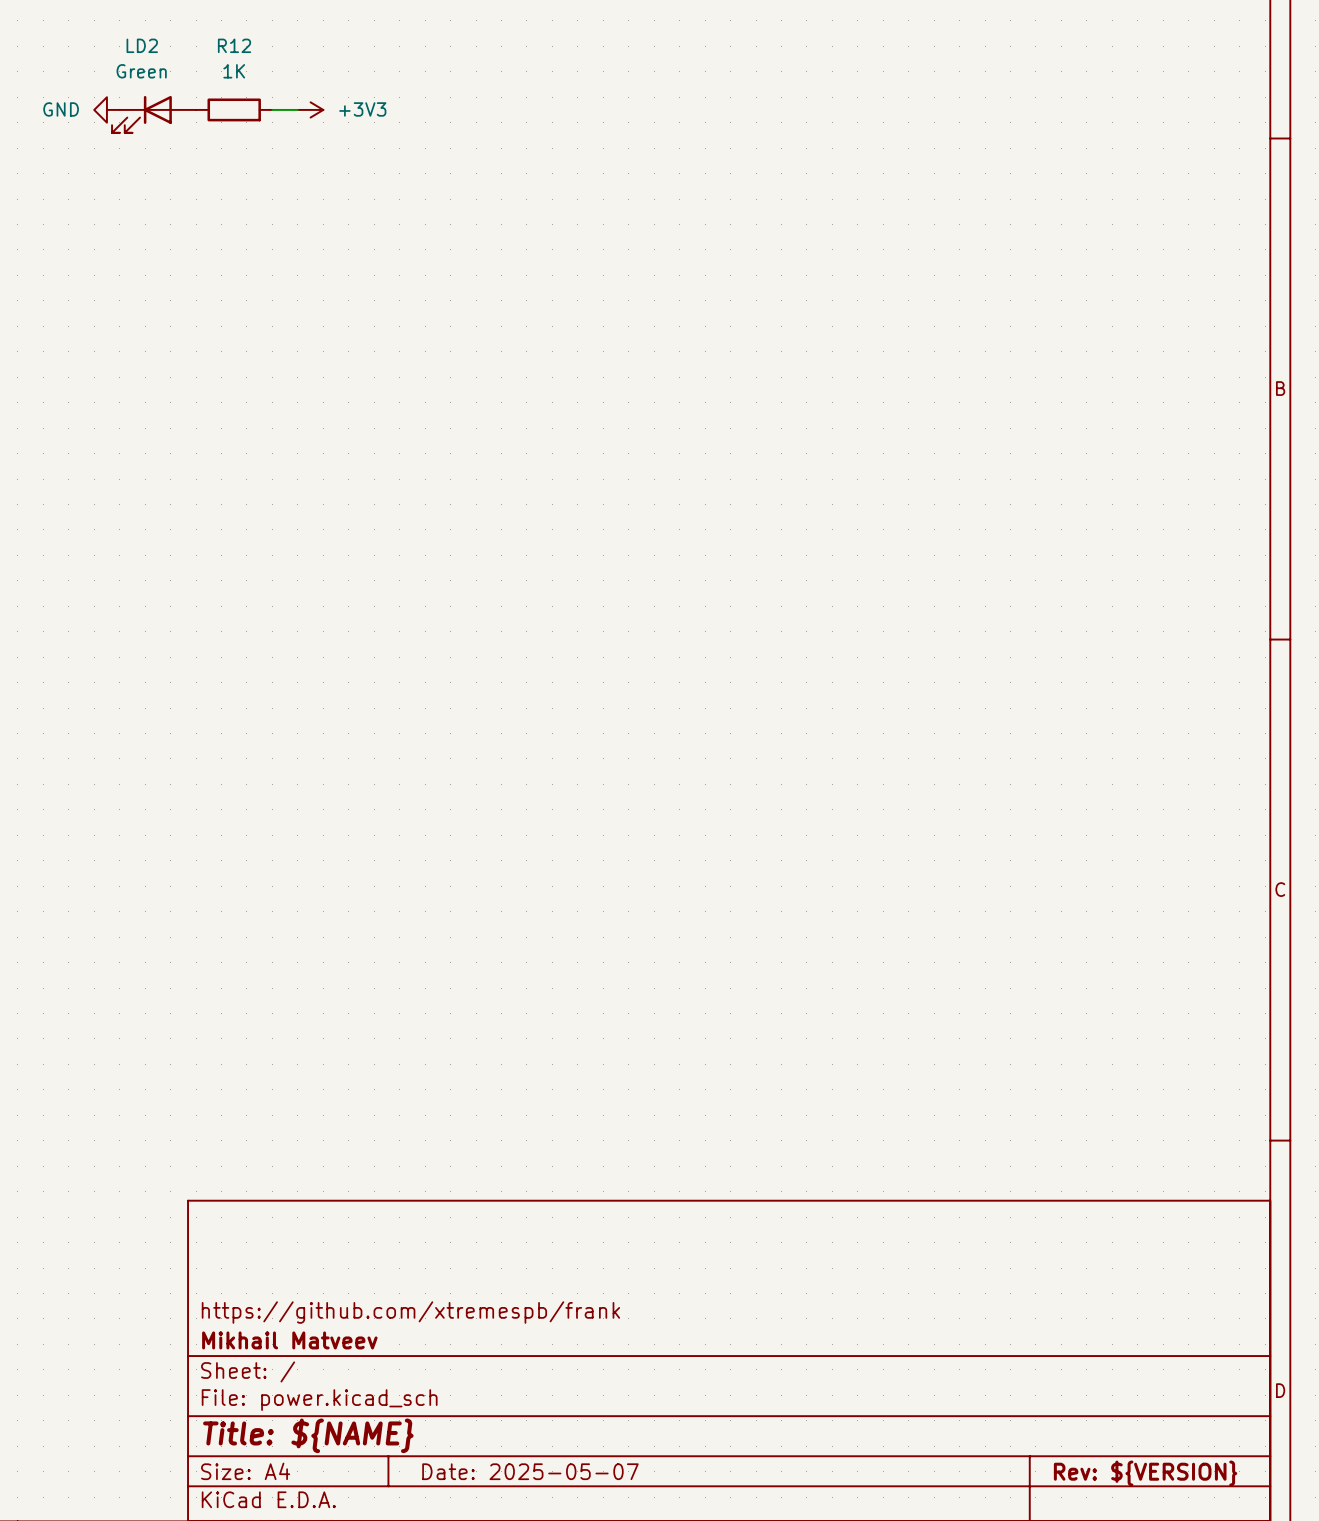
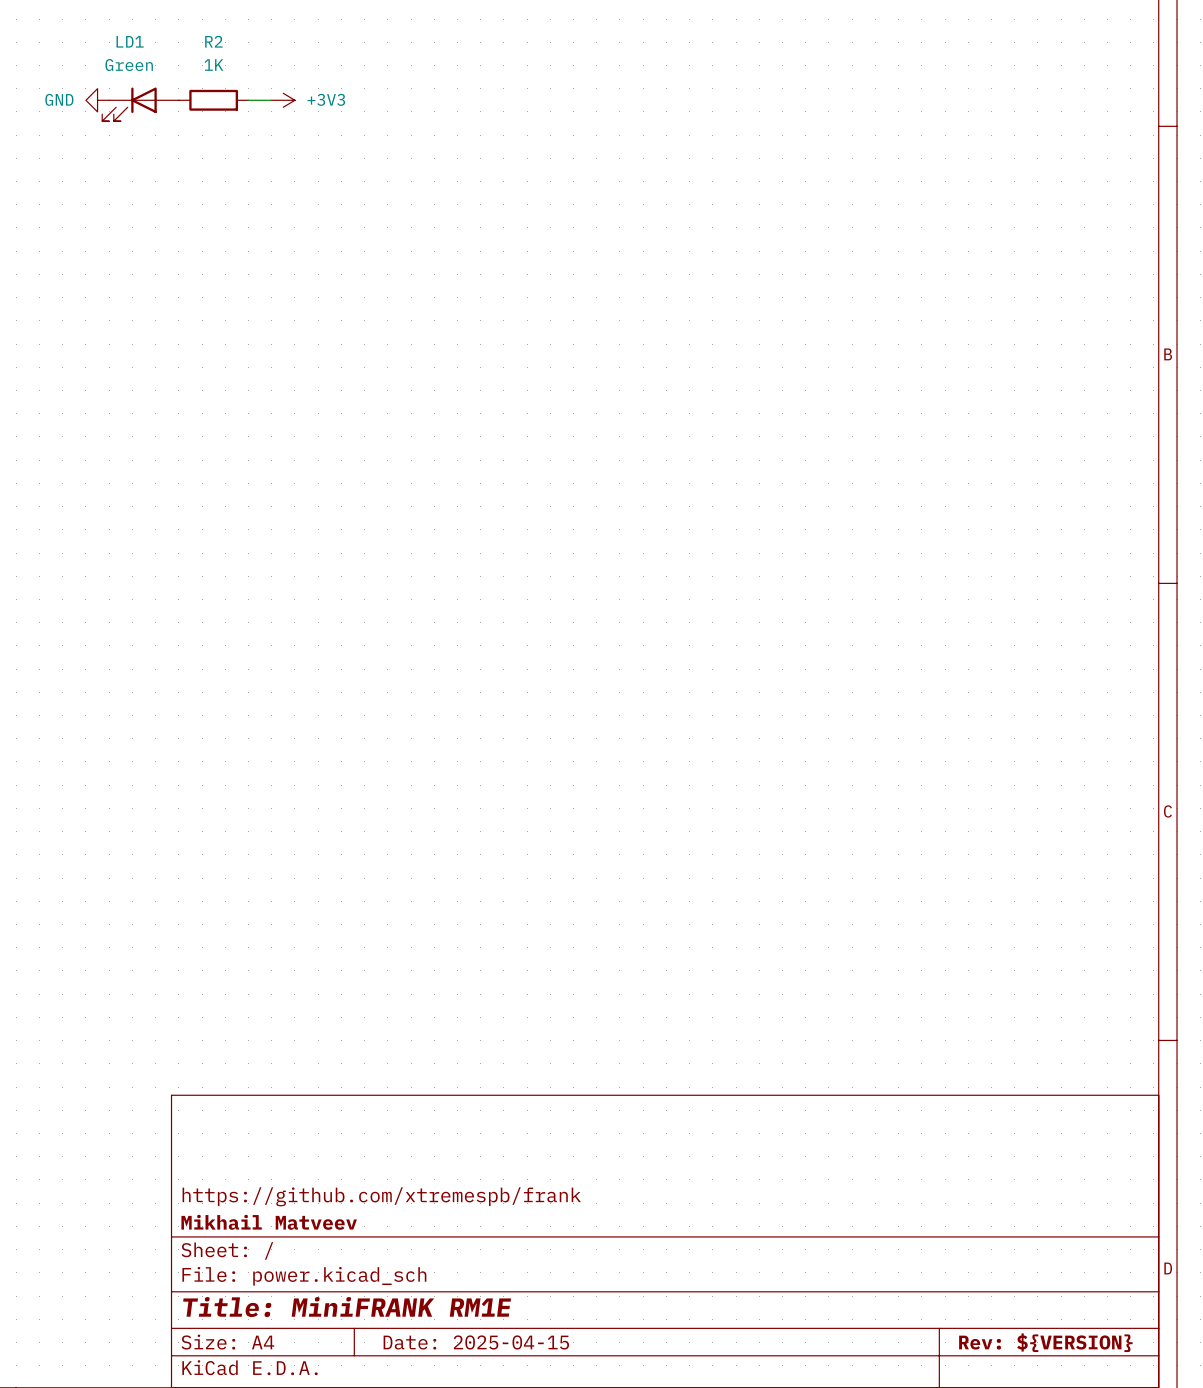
LD2 name: LD2 (142, 45) -> LD1 (130, 41)
R12 name: R12 (234, 45) -> R2 (213, 41)
title block: Title: ${NAME} (308, 1435) -> Title: MiniFRANK RM1E (347, 1307)
title block: Date: 2025-05-07 (530, 1471) -> Date: 2025-04-15 (476, 1342)

